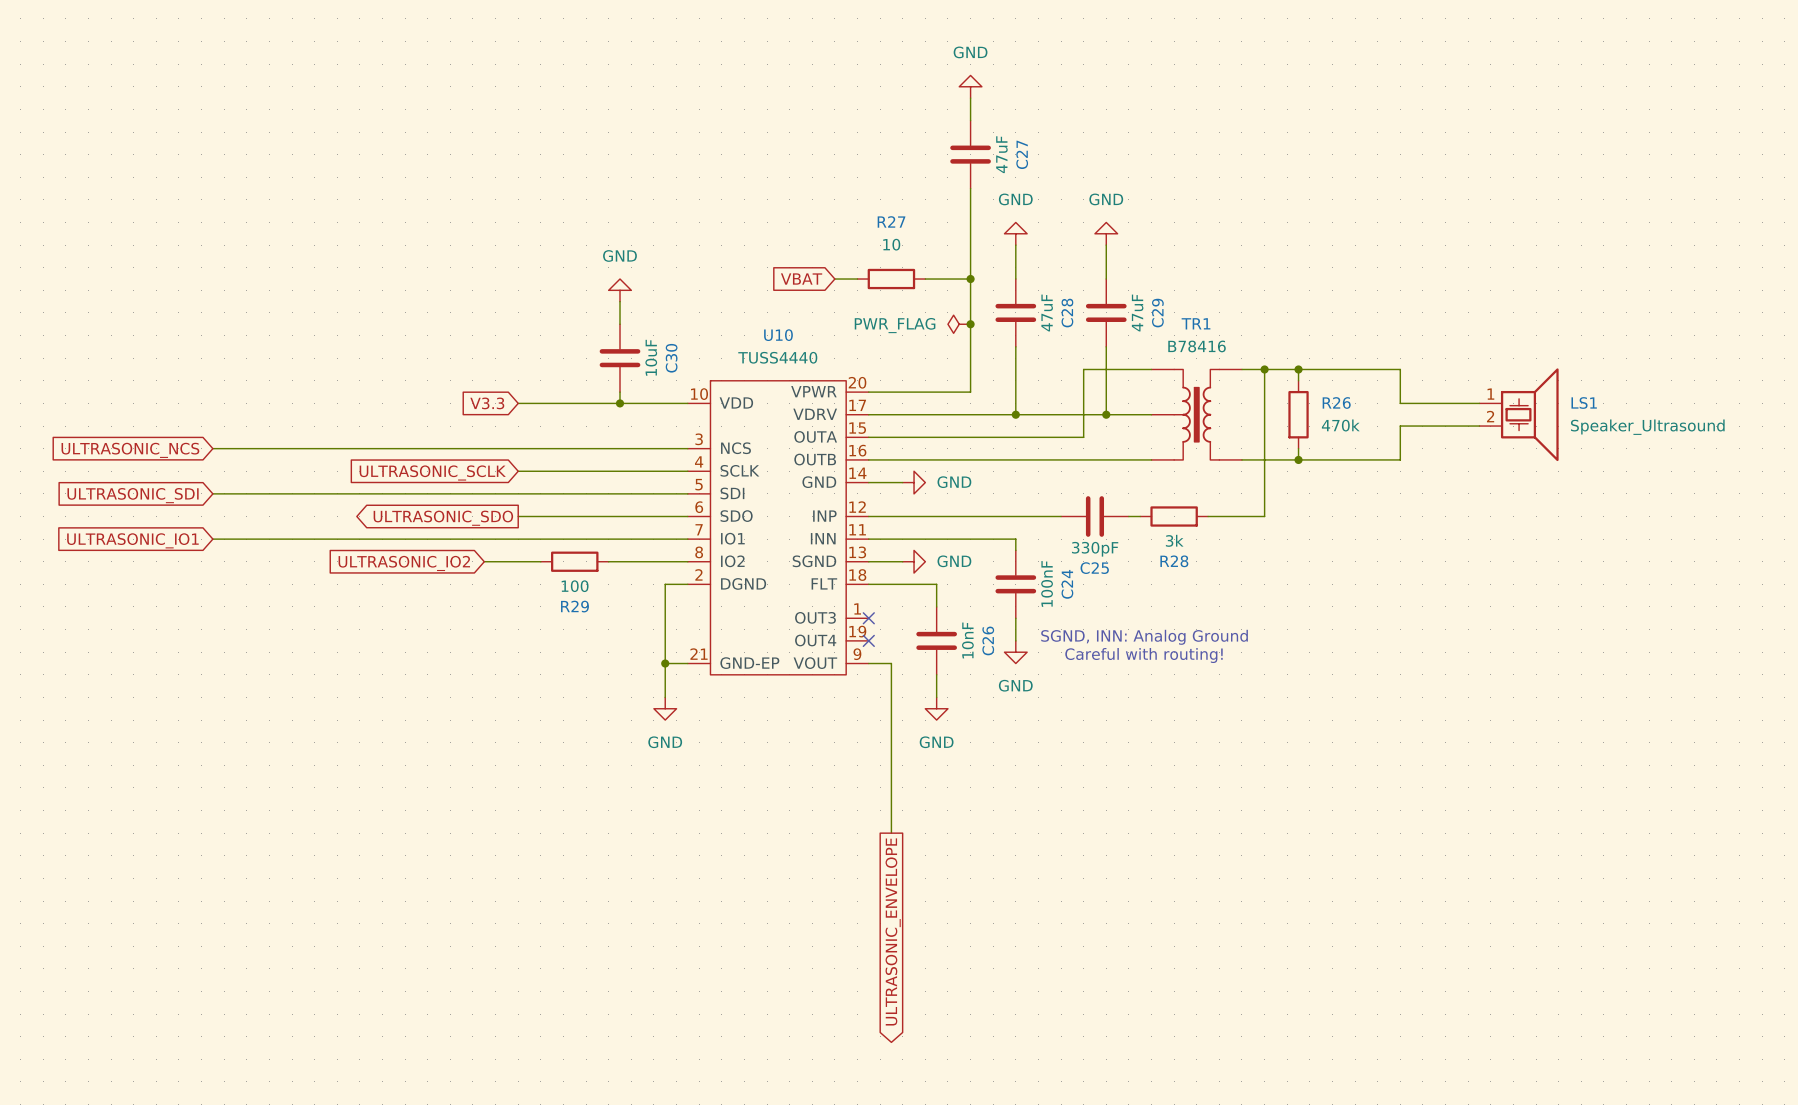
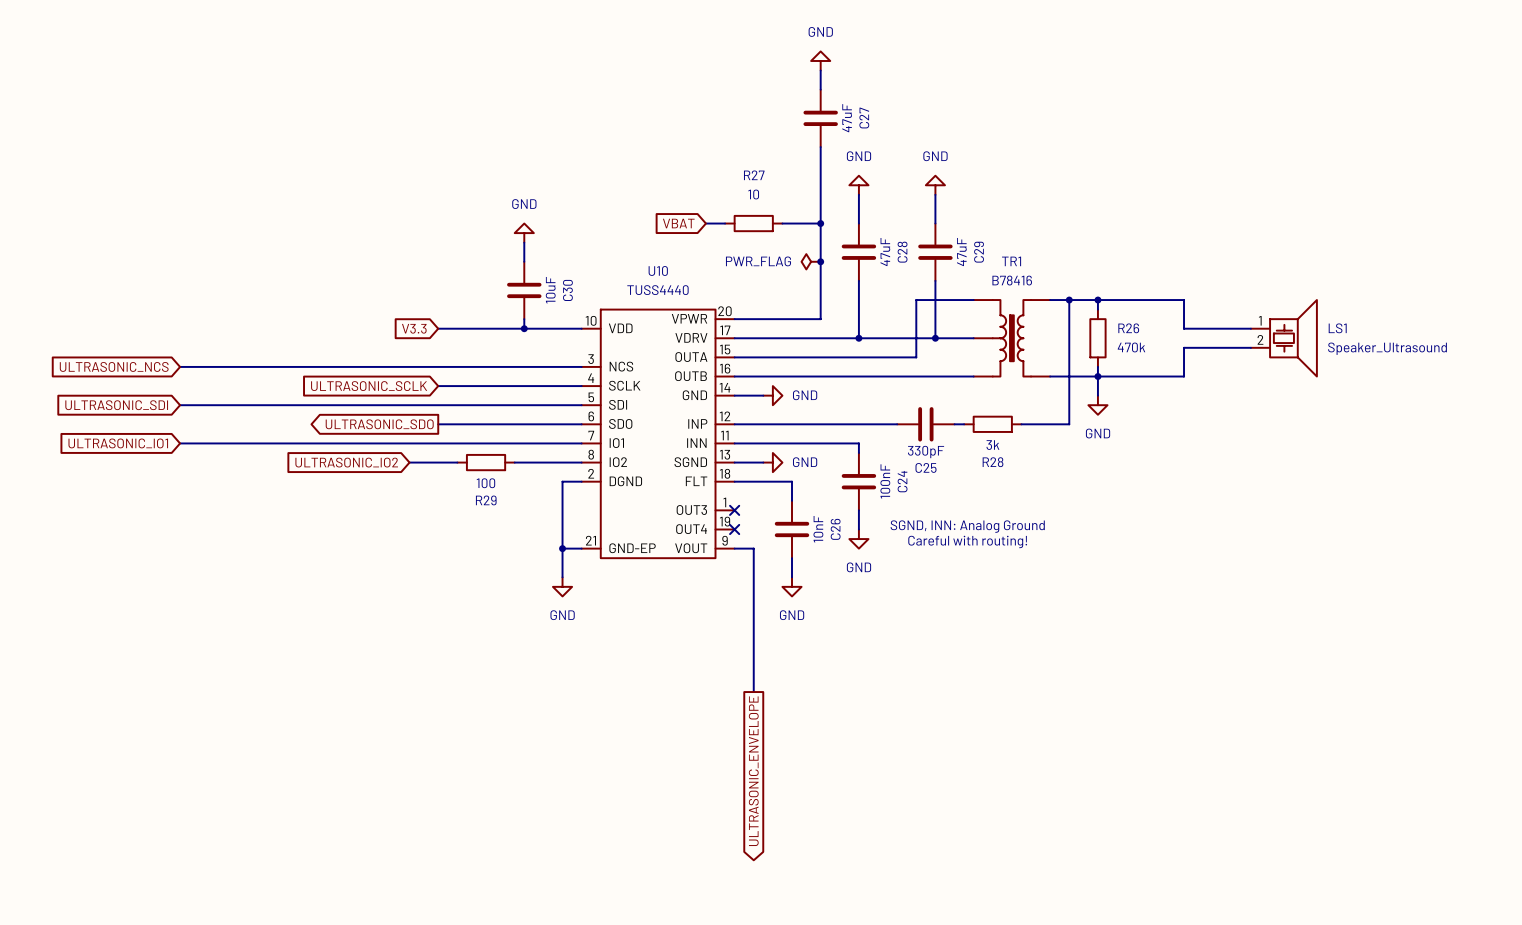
wire: none -> (1097, 376) (1097, 395)
power symbol: none -> GND (1097, 405)

